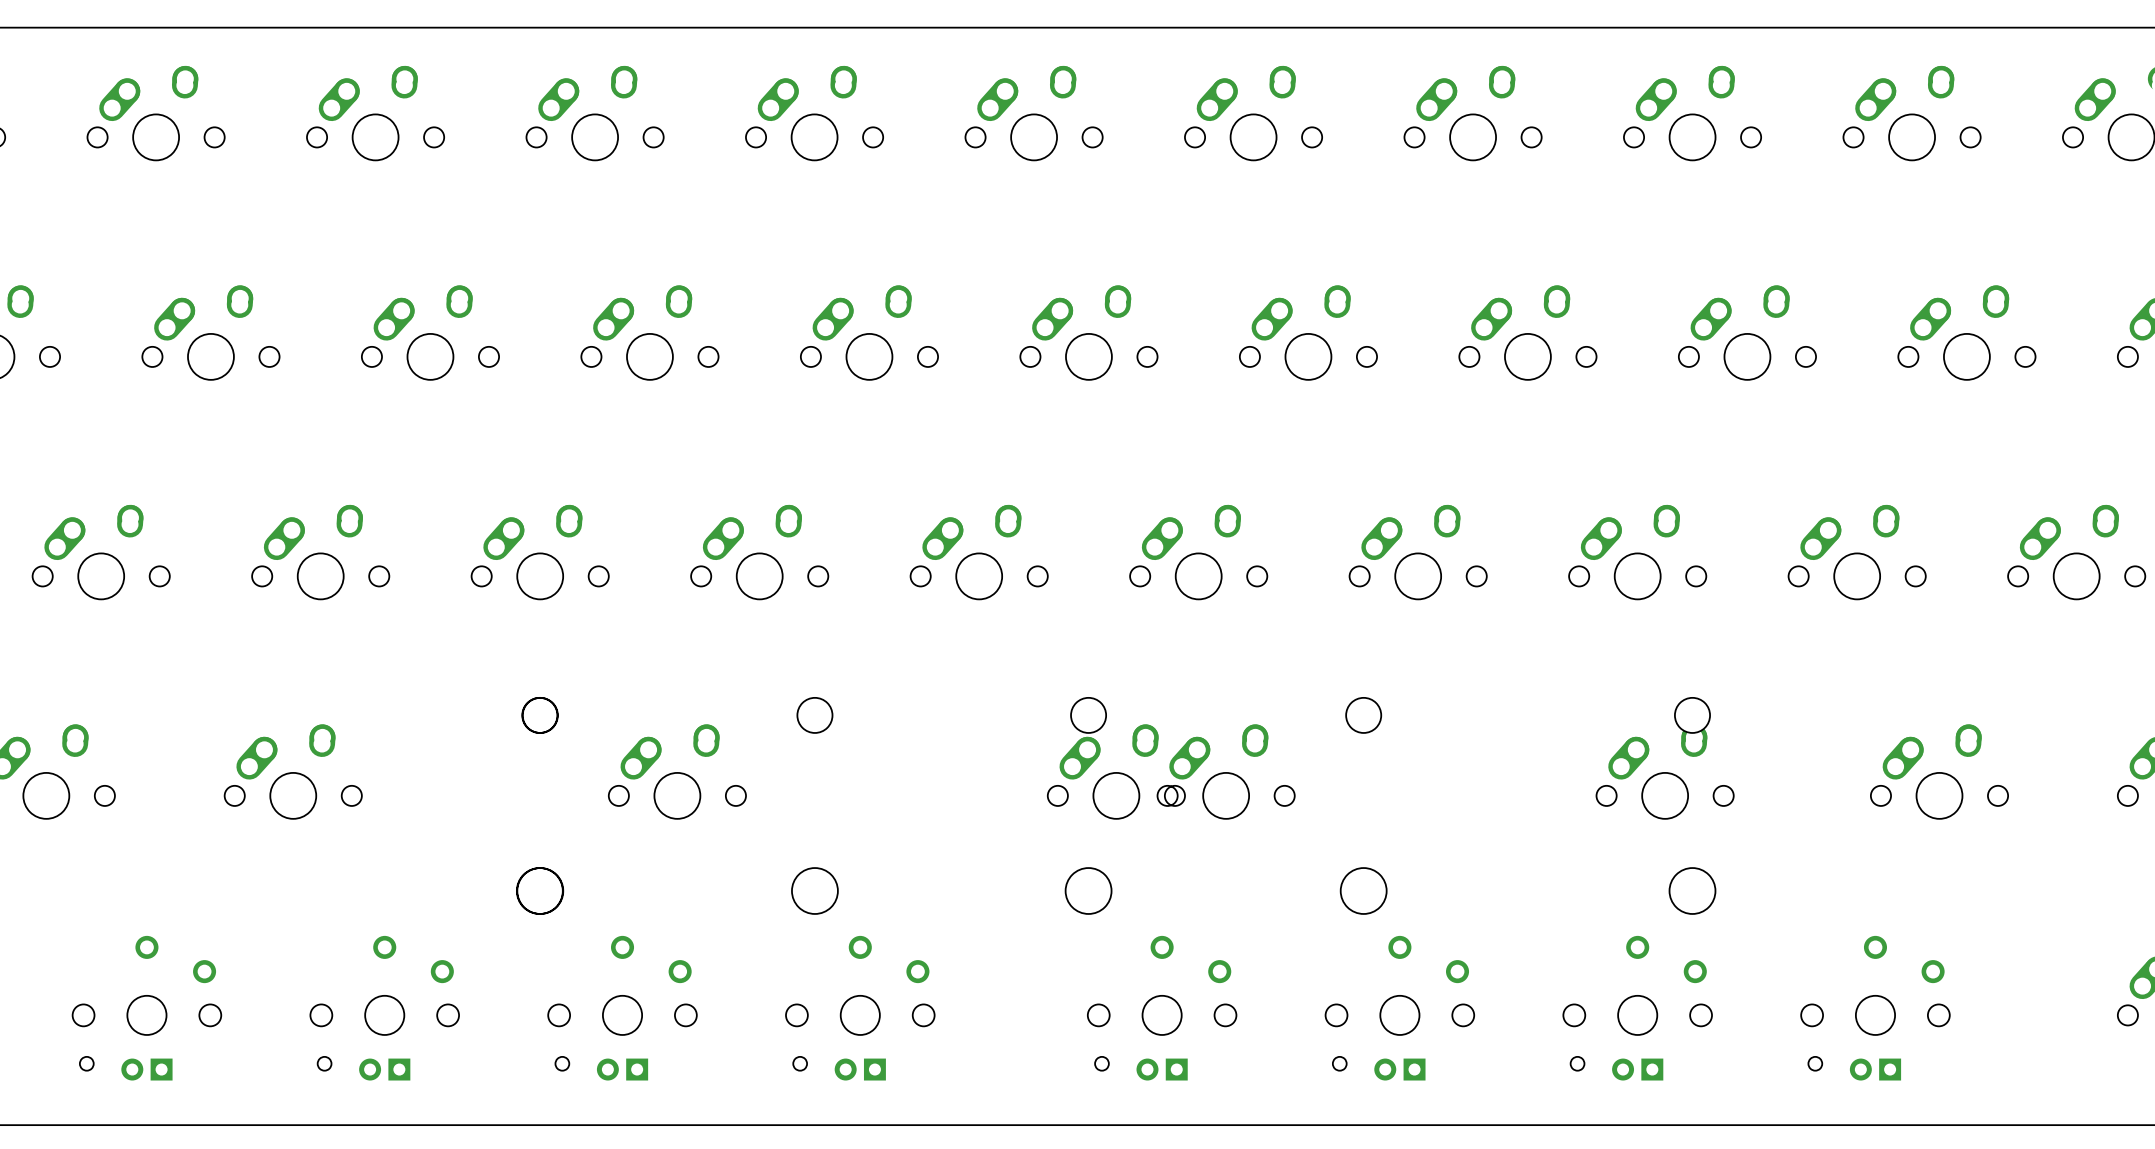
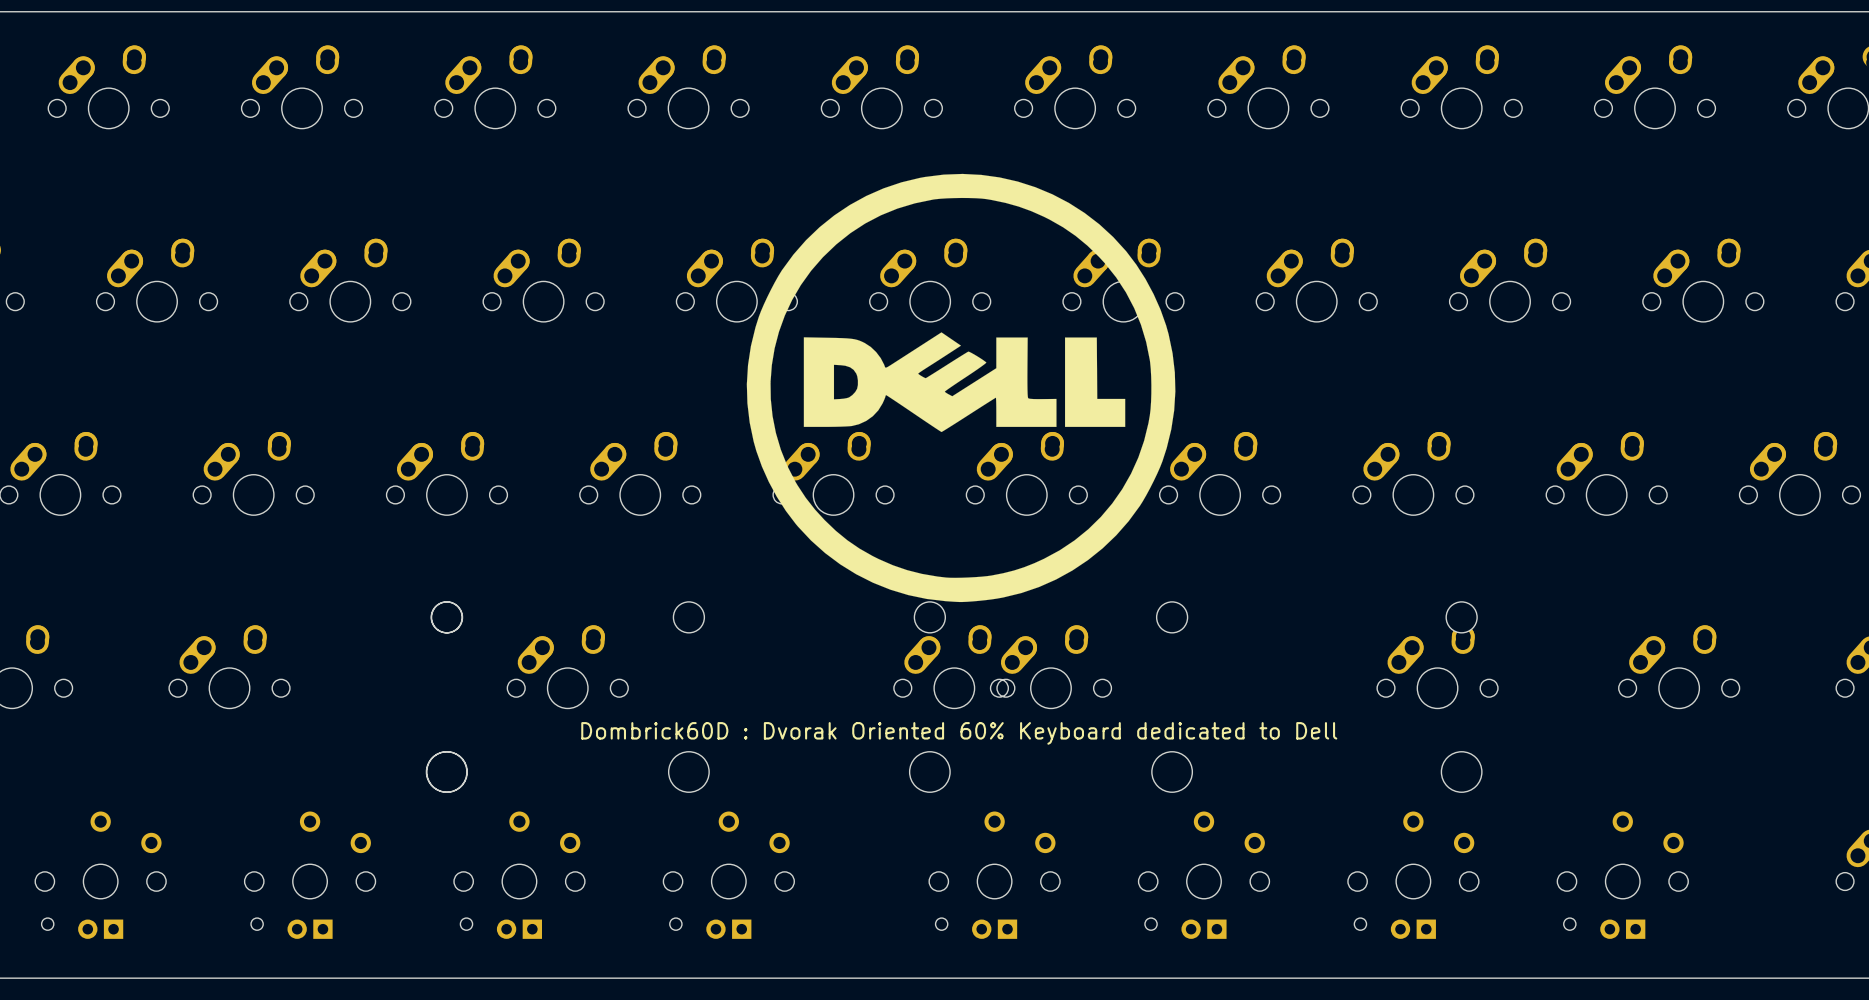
drawing: none -> [746, 173, 1176, 603]
text: none -> Dombrick60D : Dvorak Oriented 60% Keyboard dedicated to Dell (959, 733)

